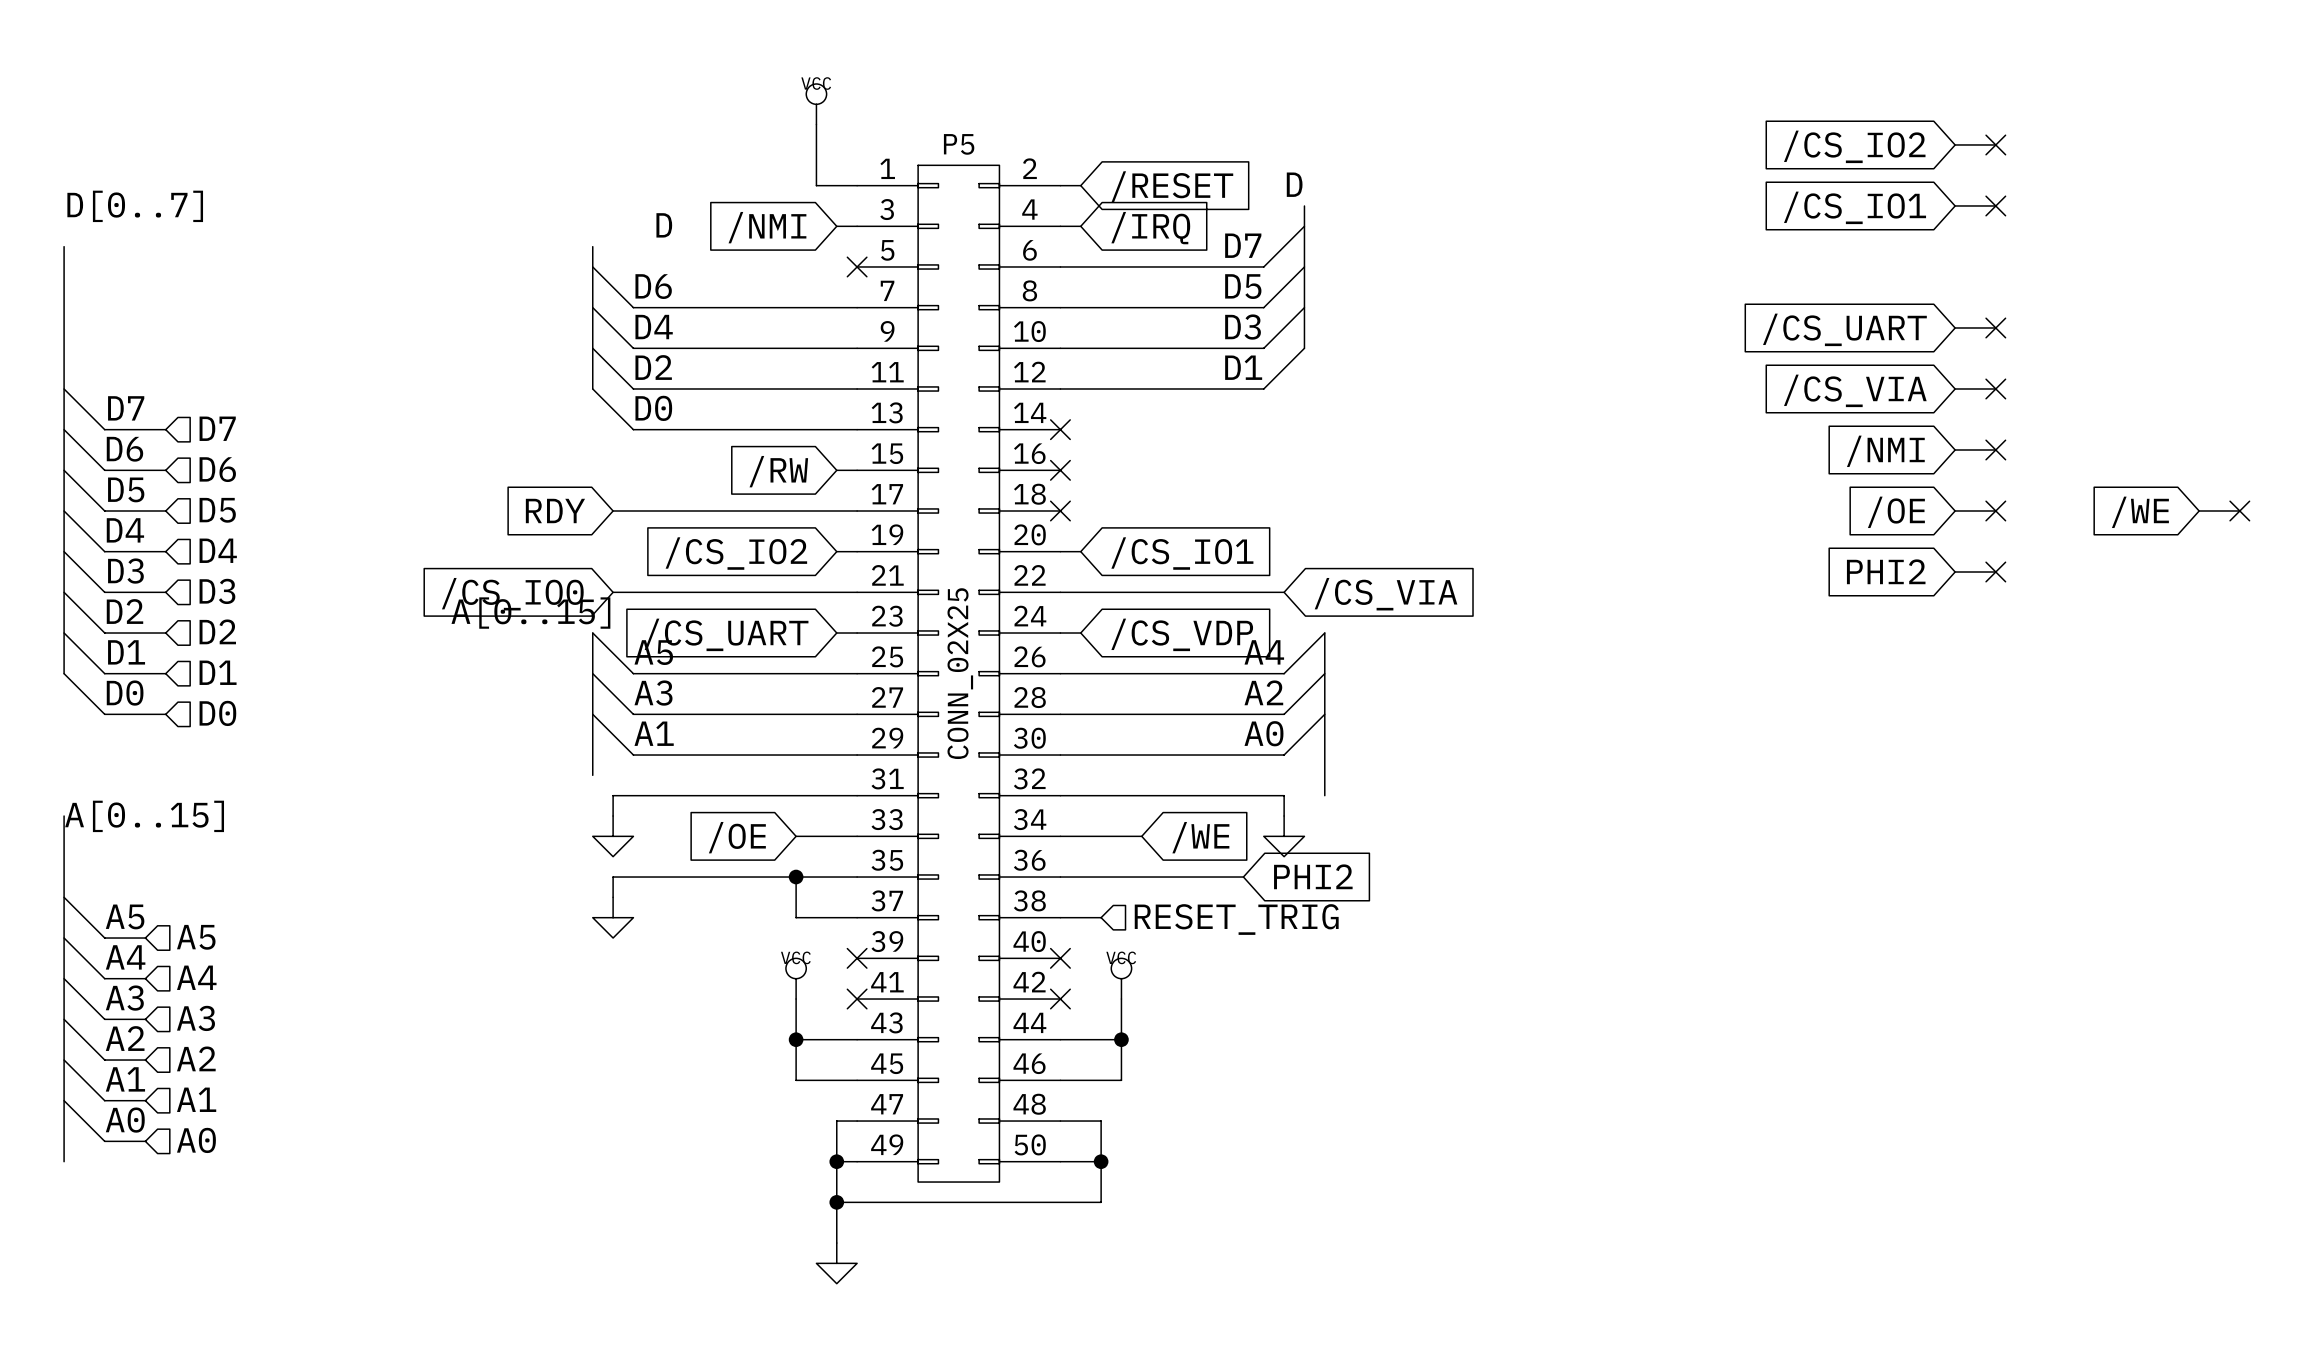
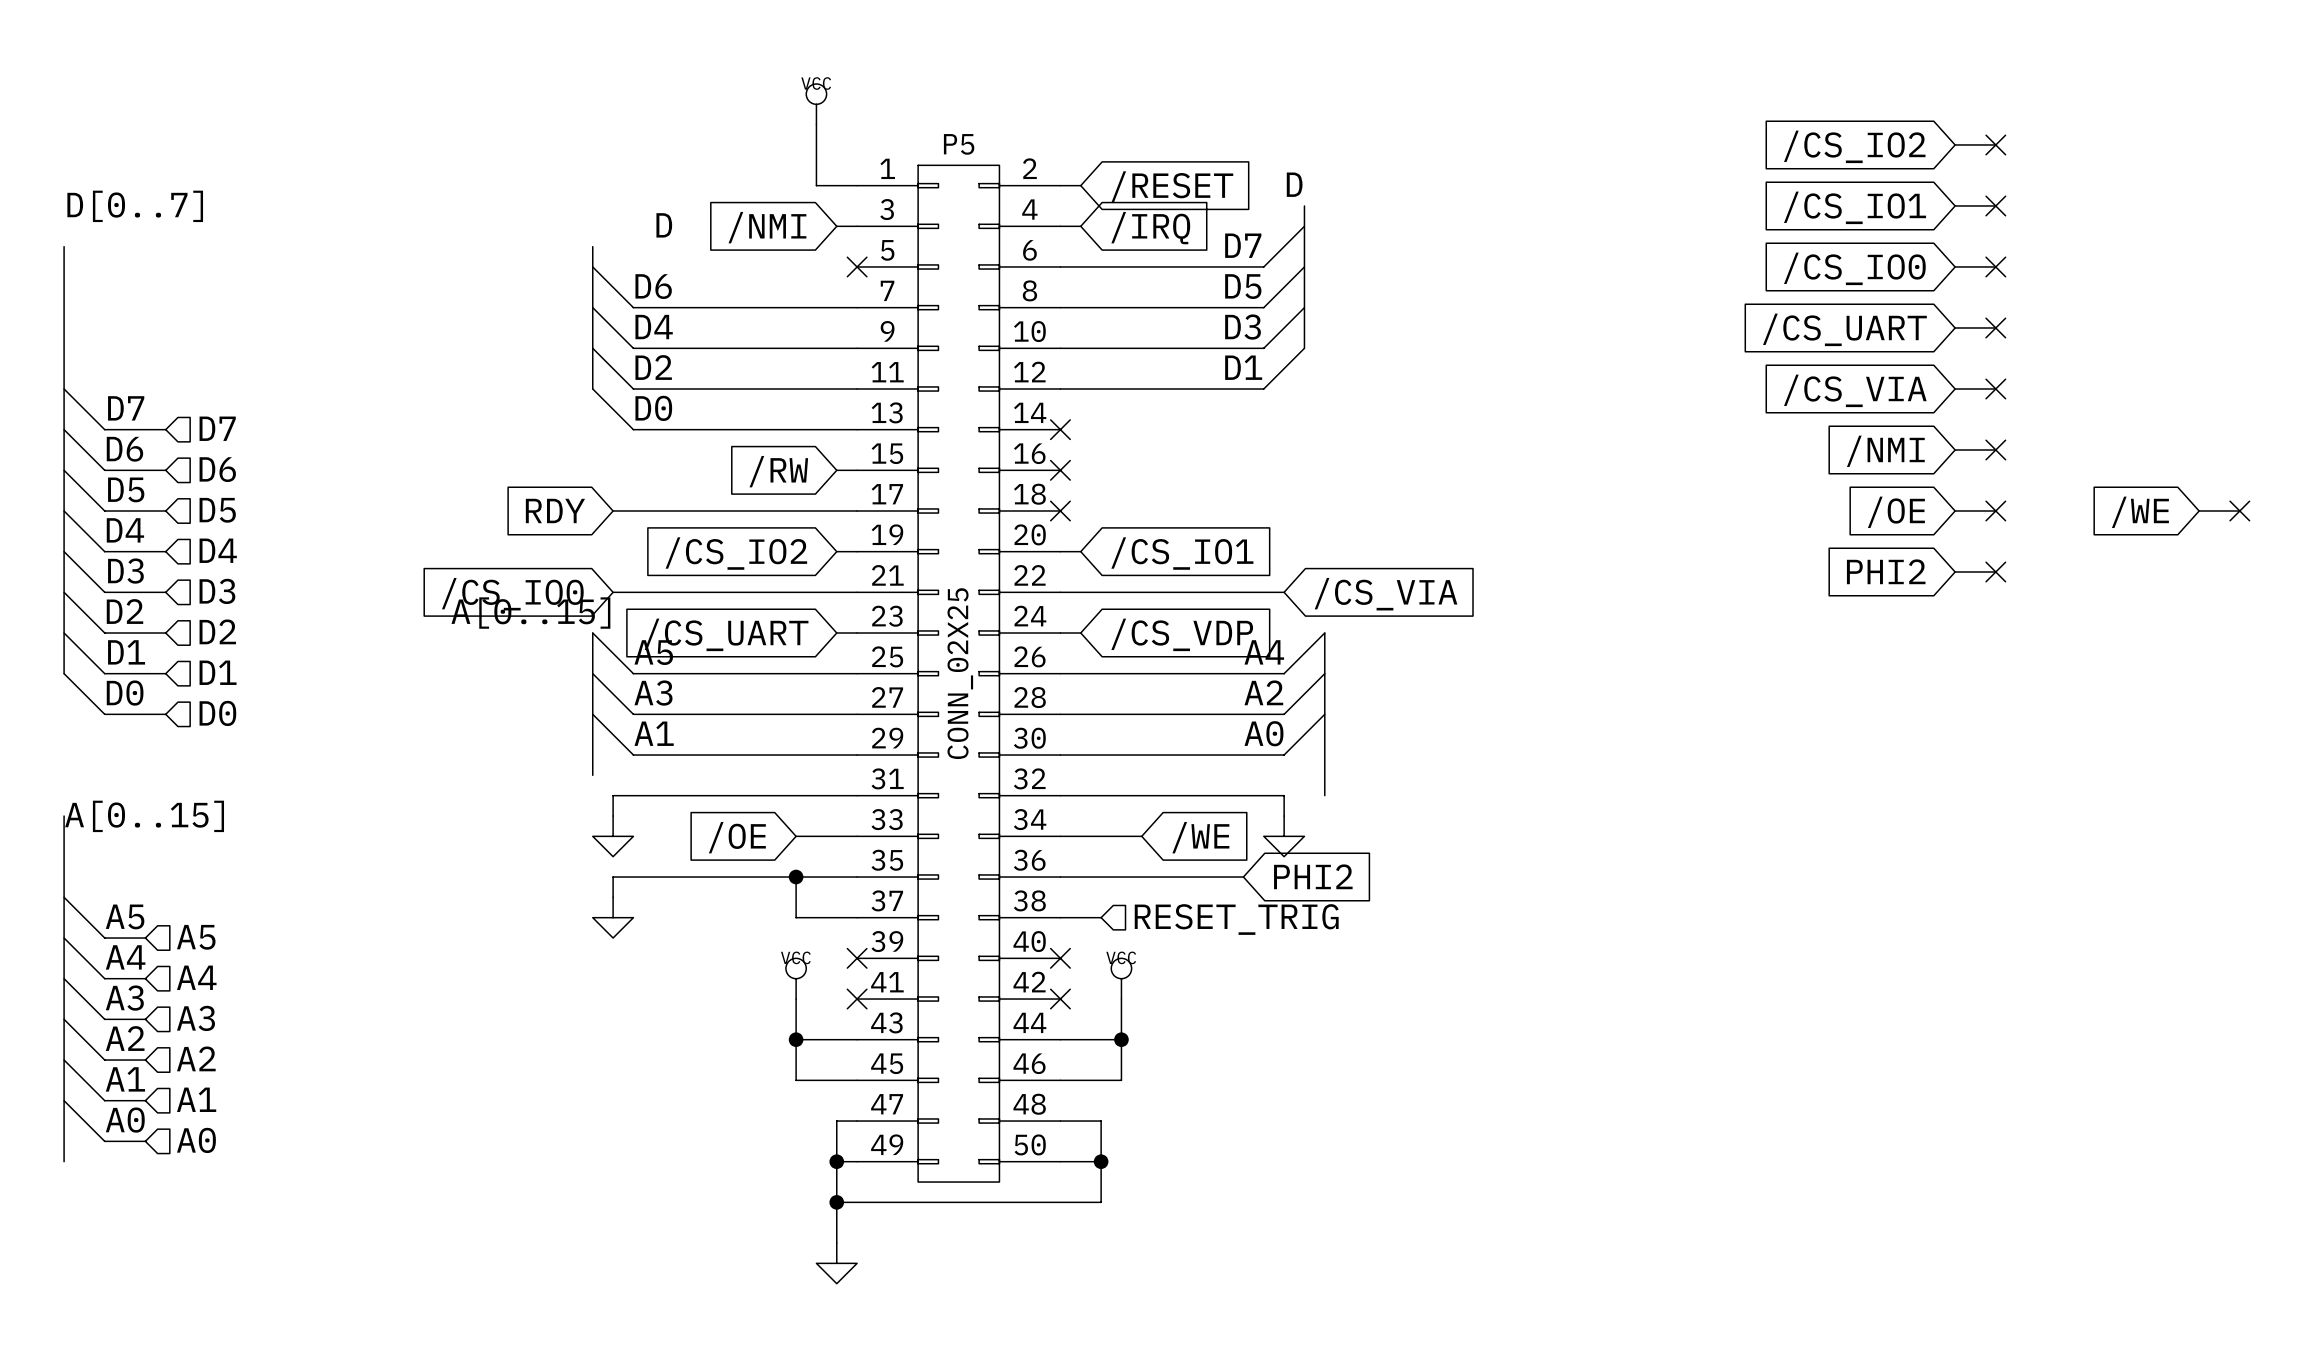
wire: none -> (1955, 266) (1995, 266)
no-connect mark: none -> (1995, 266)
global label: none -> /CS_IO0 (1854, 268)

